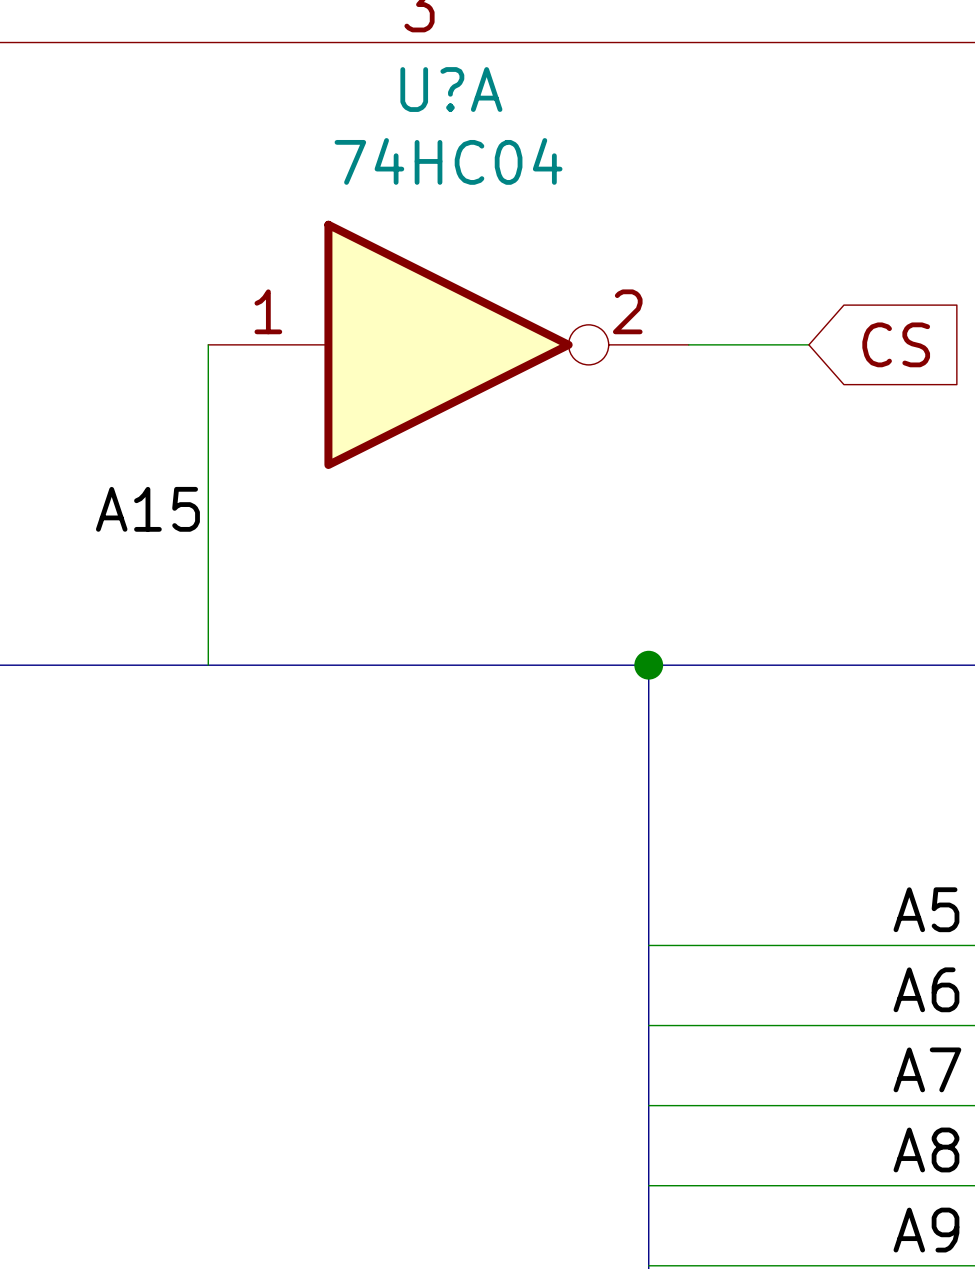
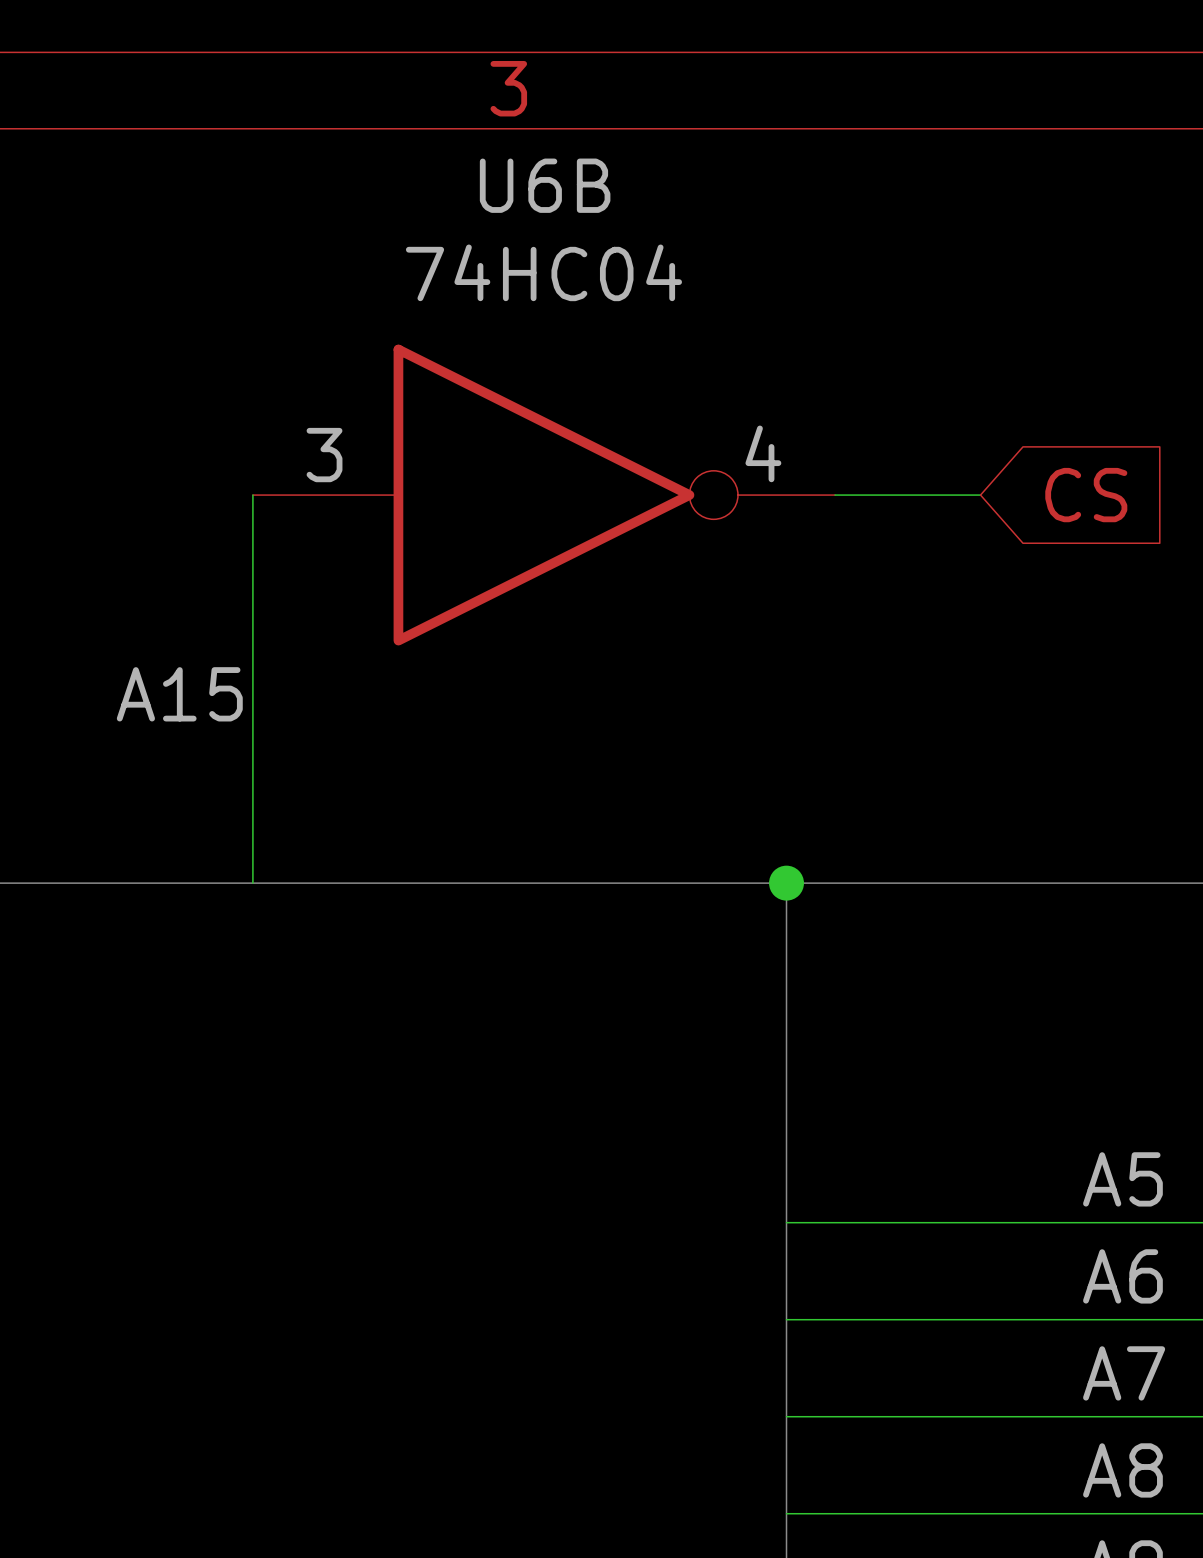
U?A name: U?A (451, 89) -> U6B (545, 185)
U?A pin number: 1 (268, 311) -> 3 (324, 455)
U?A pin number: 2 (627, 311) -> 4 (763, 453)

